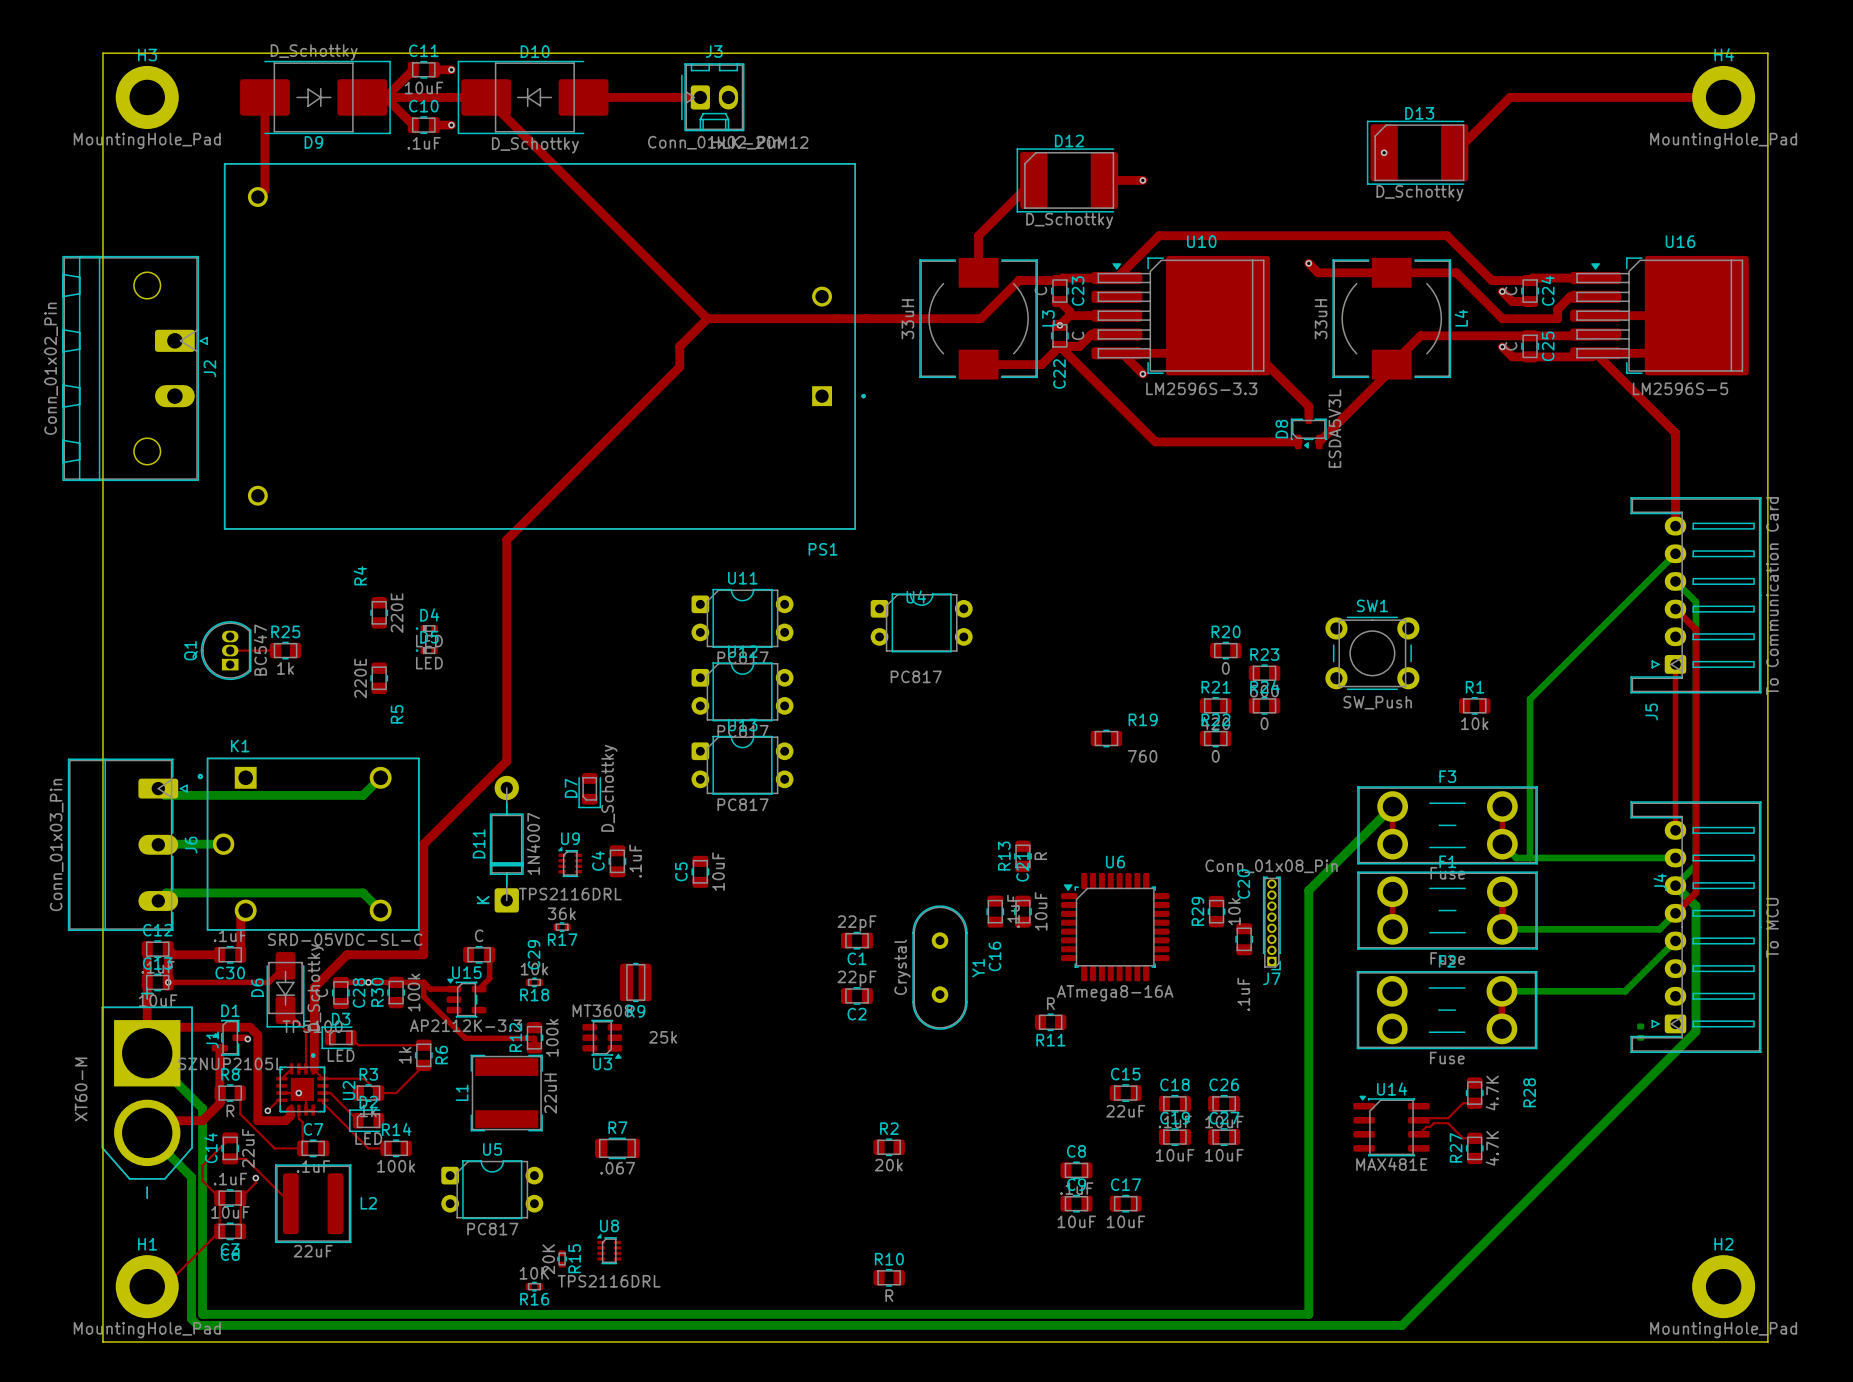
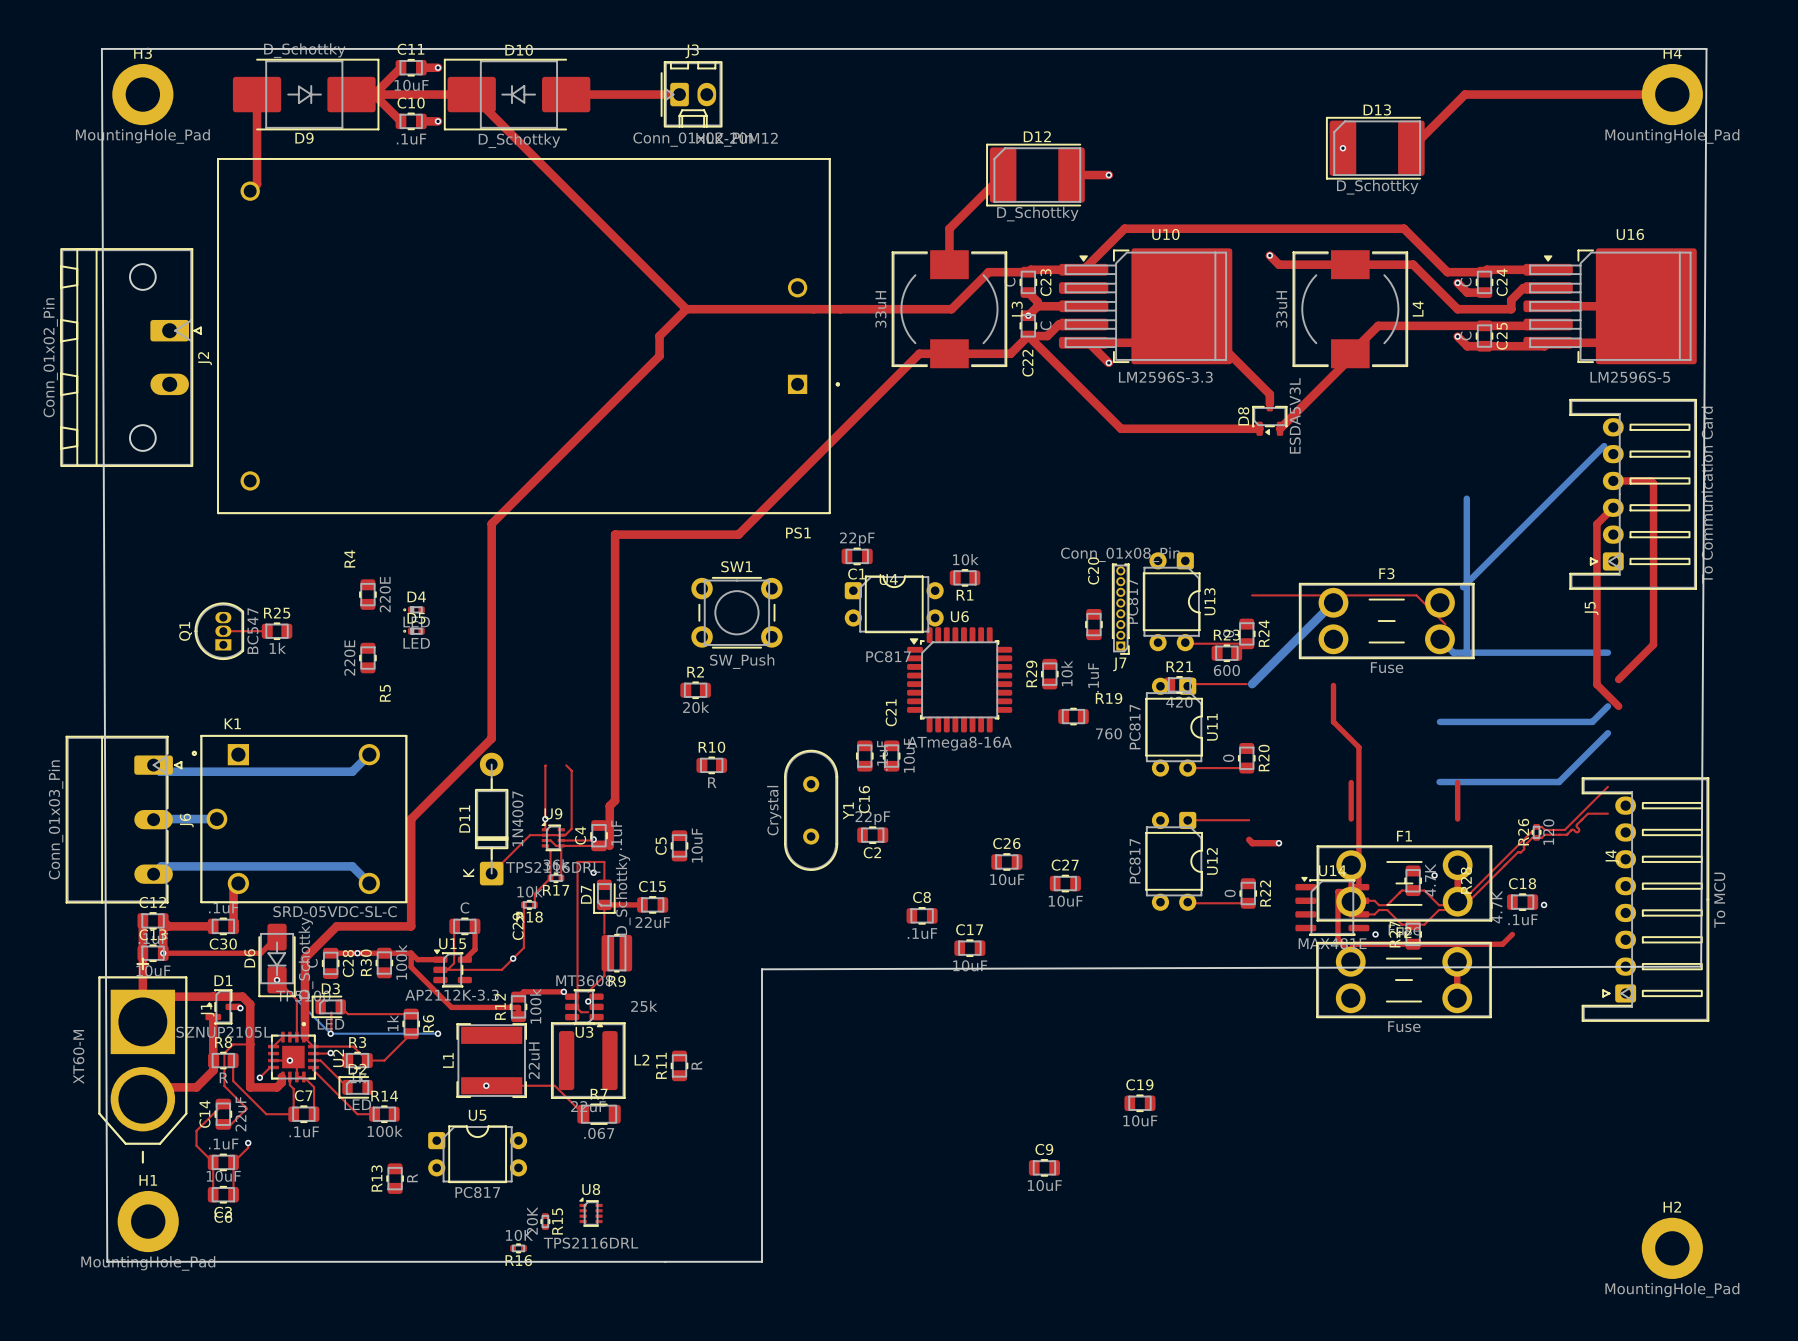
board edge: (102, 53) (1767, 53) (1767, 1341) (102, 1341) (102, 53) -> (101, 48) (107, 1261) (762, 1261) (762, 969) (1701, 966) (1706, 48) (101, 48)
top track: (1595, 353) (1675, 433) (1675, 526) -> none
top track: none -> (949, 353) (919, 353) (738, 534) (615, 534) (615, 800) (609, 806) (609, 845) (556, 845) (550, 840) (545, 840)
bottom track: none -> (1604, 446) (1463, 587)
top track: none -> (1613, 480) (1650, 480) (1653, 483) (1653, 644) (1618, 679)
bottom track: none -> (1466, 498) (1466, 652)
top track: none -> (1613, 507) (1596, 524) (1596, 684) (1618, 706)
bottom track: (1675, 553) (1530, 699) (1530, 858) -> none
bottom track: (1675, 581) (1695, 601) (1695, 865) (1675, 885) (1695, 906) (1695, 1031) (1402, 1325) (197, 1325) (191, 1318) (191, 1177) (147, 1132) -> none
J5 position: (1695, 595) -> (1633, 494)
top track: (1675, 609) (1695, 629) (1695, 892) (1675, 913) -> none
top track: none -> (1252, 595) (1416, 595) (1445, 624)
U11 rotation: 0° (742, 618) -> 90° clockwise (1174, 727)
U11 position: (742, 618) -> (1174, 727)
bottom track: none -> (1333, 602) (1252, 684)
R20 rotation: 0° (1225, 650) -> 90° clockwise (1246, 758)
R20 position: (1225, 650) -> (1246, 758)
SW1 position: (1372, 653) -> (736, 612)
top track: none -> (1185, 642) (1246, 643)
top track: (1675, 664) (1675, 830) -> none
R1 name position: R1 (1474, 687) -> R1 (965, 595)
U12 rotation: 0° (742, 691) -> 90° clockwise (1174, 861)
U12 position: (742, 691) -> (1174, 861)
R24 rotation: 0° (1264, 705) -> 90° clockwise (1246, 633)
R24 position: (1264, 705) -> (1246, 633)
top track: none -> (1246, 684) (1189, 684) (1187, 686)
R1 position: (1474, 705) -> (965, 577)
top track: none -> (1333, 685) (1333, 721) (1358, 747) (1358, 887) (1354, 891) (1338, 891) (1338, 939) (1348, 950) (1355, 944) (1502, 944) (1512, 934)
R1 value position: 10k (1474, 723) -> 10k (965, 559)
R22 rotation: 0° (1215, 738) -> 90° clockwise (1248, 893)
R22 position: (1215, 738) -> (1248, 893)
U13 rotation: 0° (742, 765) -> 90° clockwise (1171, 601)
U13 position: (742, 765) -> (1171, 601)
top track: none -> (545, 765) (545, 829)
top track: none -> (566, 765) (571, 770) (571, 828) (565, 835) (530, 835) (491, 873)
D7 position: (589, 790) -> (604, 896)
top track: none -> (1187, 768) (1246, 768)
bottom track: (1392, 806) (1308, 890) (1308, 1314) (202, 1314) (202, 1108) (147, 1053) -> none
top track: none -> (1607, 786) (1564, 829) (1544, 829) (1541, 826) (1536, 826) (1458, 905) (1439, 905) (1424, 890) (1401, 890) (1387, 905) (1379, 905) (1374, 900) (1358, 900)
F3 position: (1447, 825) -> (1386, 621)
top track: none -> (1607, 813) (1587, 813) (1576, 824) (1579, 829) (1577, 832) (1572, 829) (1566, 834) (1544, 834) (1541, 837) (1532, 837) (1521, 852) (1517, 852) (1460, 910) (1439, 910) (1424, 924) (1401, 924) (1387, 910) (1379, 910) (1374, 914) (1358, 914)
via: none -> (545, 819)
bottom track: (1502, 844) (1516, 858) (1675, 858) -> (1439, 639) (1453, 652) (1607, 652)
top track: none -> (1249, 820) (1187, 820)
R13 position: (1022, 856) -> (395, 1178)
top track: none -> (593, 839) (561, 840)
via: none -> (593, 839)
top track: none -> (1249, 839) (1252, 843) (1278, 843)
via: none -> (1278, 843)
top track: none -> (545, 845) (550, 851) (550, 878) (534, 893) (534, 904)
top track: none -> (561, 845) (561, 878)
via: none -> (593, 872)
via: none -> (1434, 875)
top track: none -> (604, 884) (604, 861) (577, 861) (577, 1008) (581, 1012) (588, 1012)
C16 position: (995, 911) -> (864, 756)
C21 position: (1022, 911) -> (891, 756)
R29 position: (1216, 911) -> (1049, 674)
bottom track: (1675, 913) (1659, 929) (1502, 929) -> (1607, 706) (1592, 721) (1439, 721)
J7 position: (1271, 923) -> (1120, 609)
R17 position: (562, 927) -> (555, 878)
U6 position: (1115, 927) -> (959, 679)
top track: none -> (1187, 902) (1248, 903)
top track: none -> (523, 904) (523, 947) (501, 969) (440, 969)
top track: none -> (642, 904) (604, 904) (604, 933)
via: none -> (1544, 904)
C20 position: (1244, 939) -> (1093, 624)
C1 position: (857, 940) -> (857, 556)
bottom track: (1675, 940) (1625, 991) (1501, 991) -> (1607, 733) (1559, 782) (1439, 782)
top track: none -> (454, 926) (454, 963) (447, 969)
via: none -> (1375, 934)
Y1 position: (940, 967) -> (811, 810)
top track: none -> (604, 951) (604, 975) (588, 991)
R18 position: (534, 982) -> (529, 904)
via: none -> (513, 958)
C2 position: (857, 995) -> (872, 835)
bottom track: none -> (277, 980) (330, 1033) (438, 1033)
via: none -> (277, 980)
top track: none -> (563, 991) (523, 991) (518, 997)
via: none -> (563, 991)
R11 rotation: 0° (1050, 1022) -> 90° clockwise (679, 1065)
R11 position: (1050, 1022) -> (679, 1065)
via: none -> (588, 1001)
R26 side: bottom (1640, 1032) -> top (1536, 832)
top track: none -> (331, 1012) (330, 1033)
via: none -> (330, 1033)
via: none -> (438, 1033)
top track: none -> (330, 1053) (313, 1053)
via: none -> (330, 1053)
C15 position: (1125, 1093) -> (652, 904)
R28 position: (1474, 1093) -> (1413, 880)
C18 position: (1174, 1103) -> (1522, 902)
C26 position: (1224, 1103) -> (1006, 861)
top track: (1474, 1103) (1463, 1103) (1448, 1118) (1418, 1120) -> none
top track: none -> (303, 1077) (314, 1087) (314, 1114)
top track: none -> (486, 1085) (554, 1085) (583, 1114)
via: none -> (486, 1085)
U14 position: (1391, 1125) -> (1332, 906)
top track: (1418, 1134) (1426, 1126) (1430, 1126) (1433, 1123) (1448, 1123) (1463, 1138) (1474, 1138) -> none
C27 position: (1224, 1137) -> (1065, 883)
R2 position: (889, 1147) -> (695, 690)
R27 position: (1474, 1148) -> (1413, 934)
R27 value position: 4.7K (1492, 1148) -> 4.7K (1496, 907)
top track: (238, 1158) (246, 1158) (290, 1203) -> (231, 1124) (246, 1108) (224, 1086) (224, 1053) (233, 1044) (250, 1044)
C8 position: (1076, 1170) -> (922, 915)
L2 position: (313, 1203) -> (588, 1060)
C17 position: (1125, 1203) -> (969, 948)
top track: (219, 1231) (164, 1286) (147, 1286) -> none
R10 position: (889, 1277) -> (711, 765)
H1 position: (147, 1286) -> (148, 1221)

